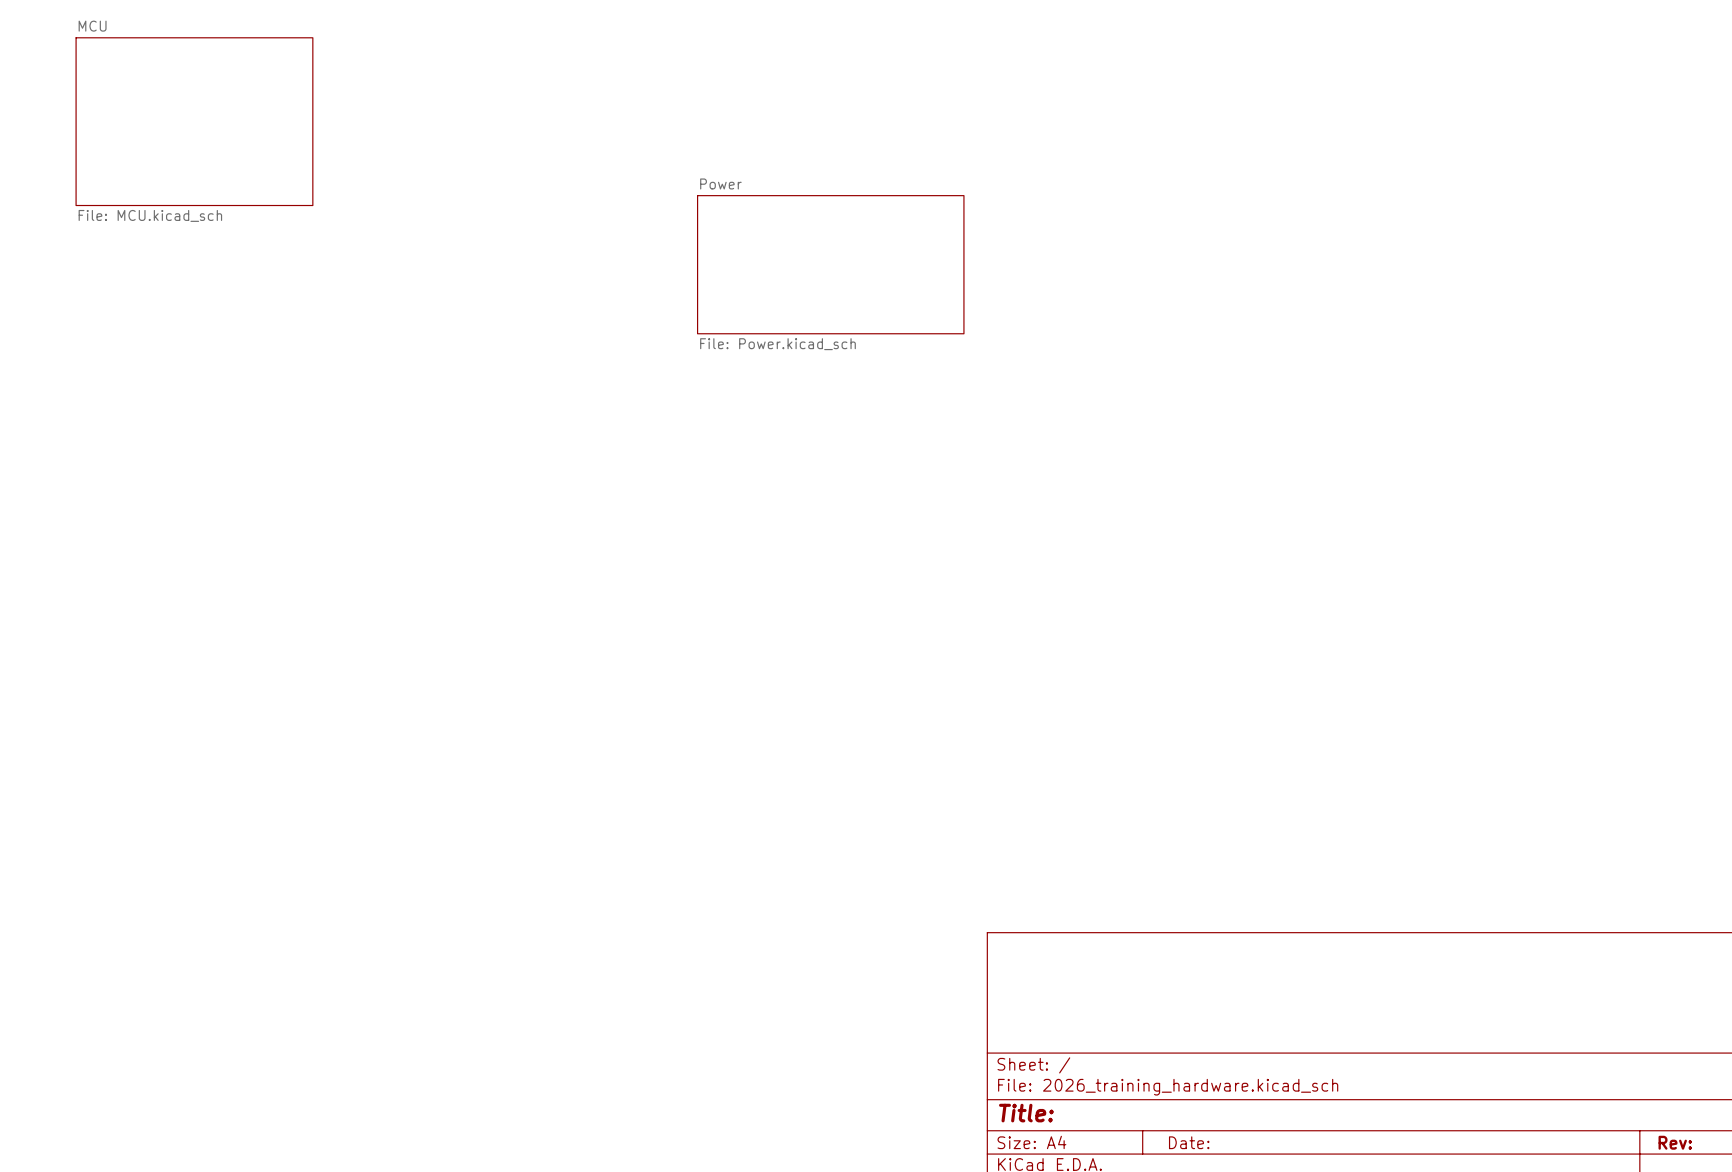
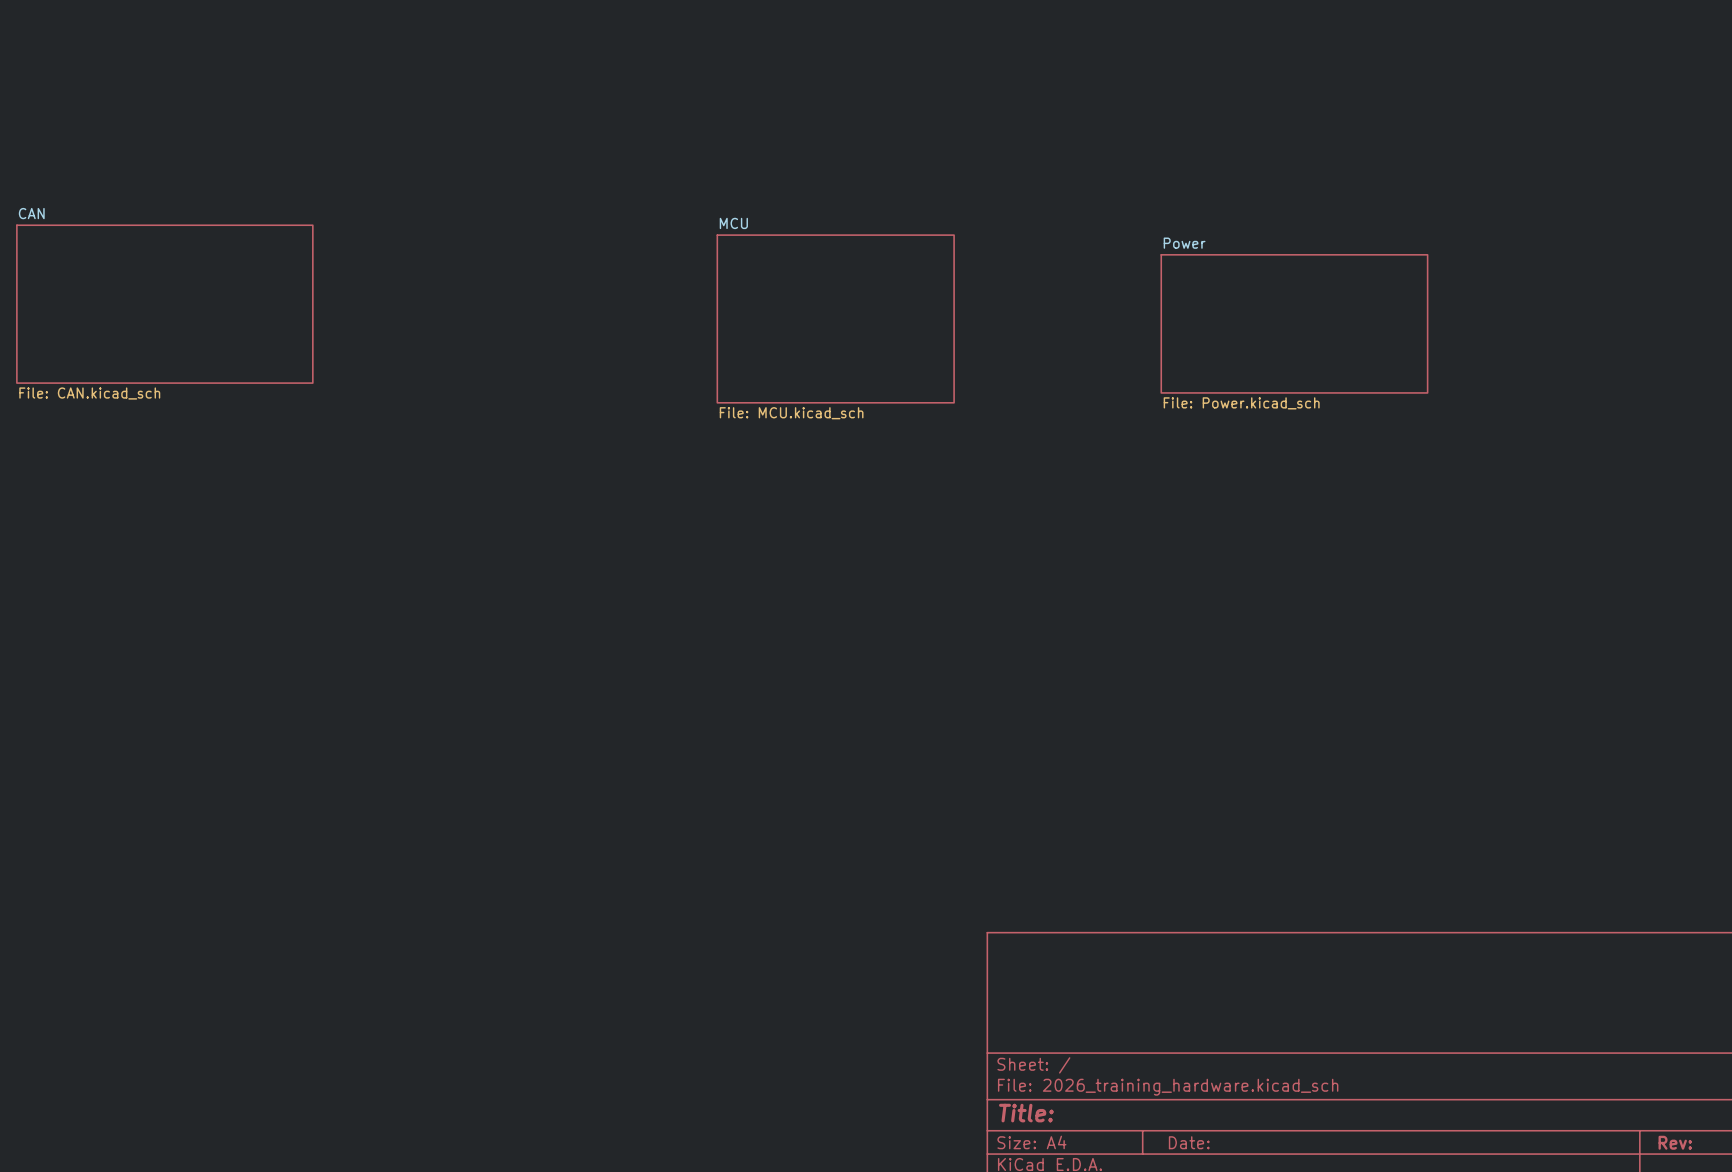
sheet MCU: File: MCU.kicad_sch (194, 121) -> none
sheet Power: File: Power.kicad_sch (830, 264) -> none
sheet CAN: none -> File: CAN.kicad_sch (164, 304)
sheet MCU: none -> File: MCU.kicad_sch (835, 318)
sheet Power: none -> File: Power.kicad_sch (1294, 323)

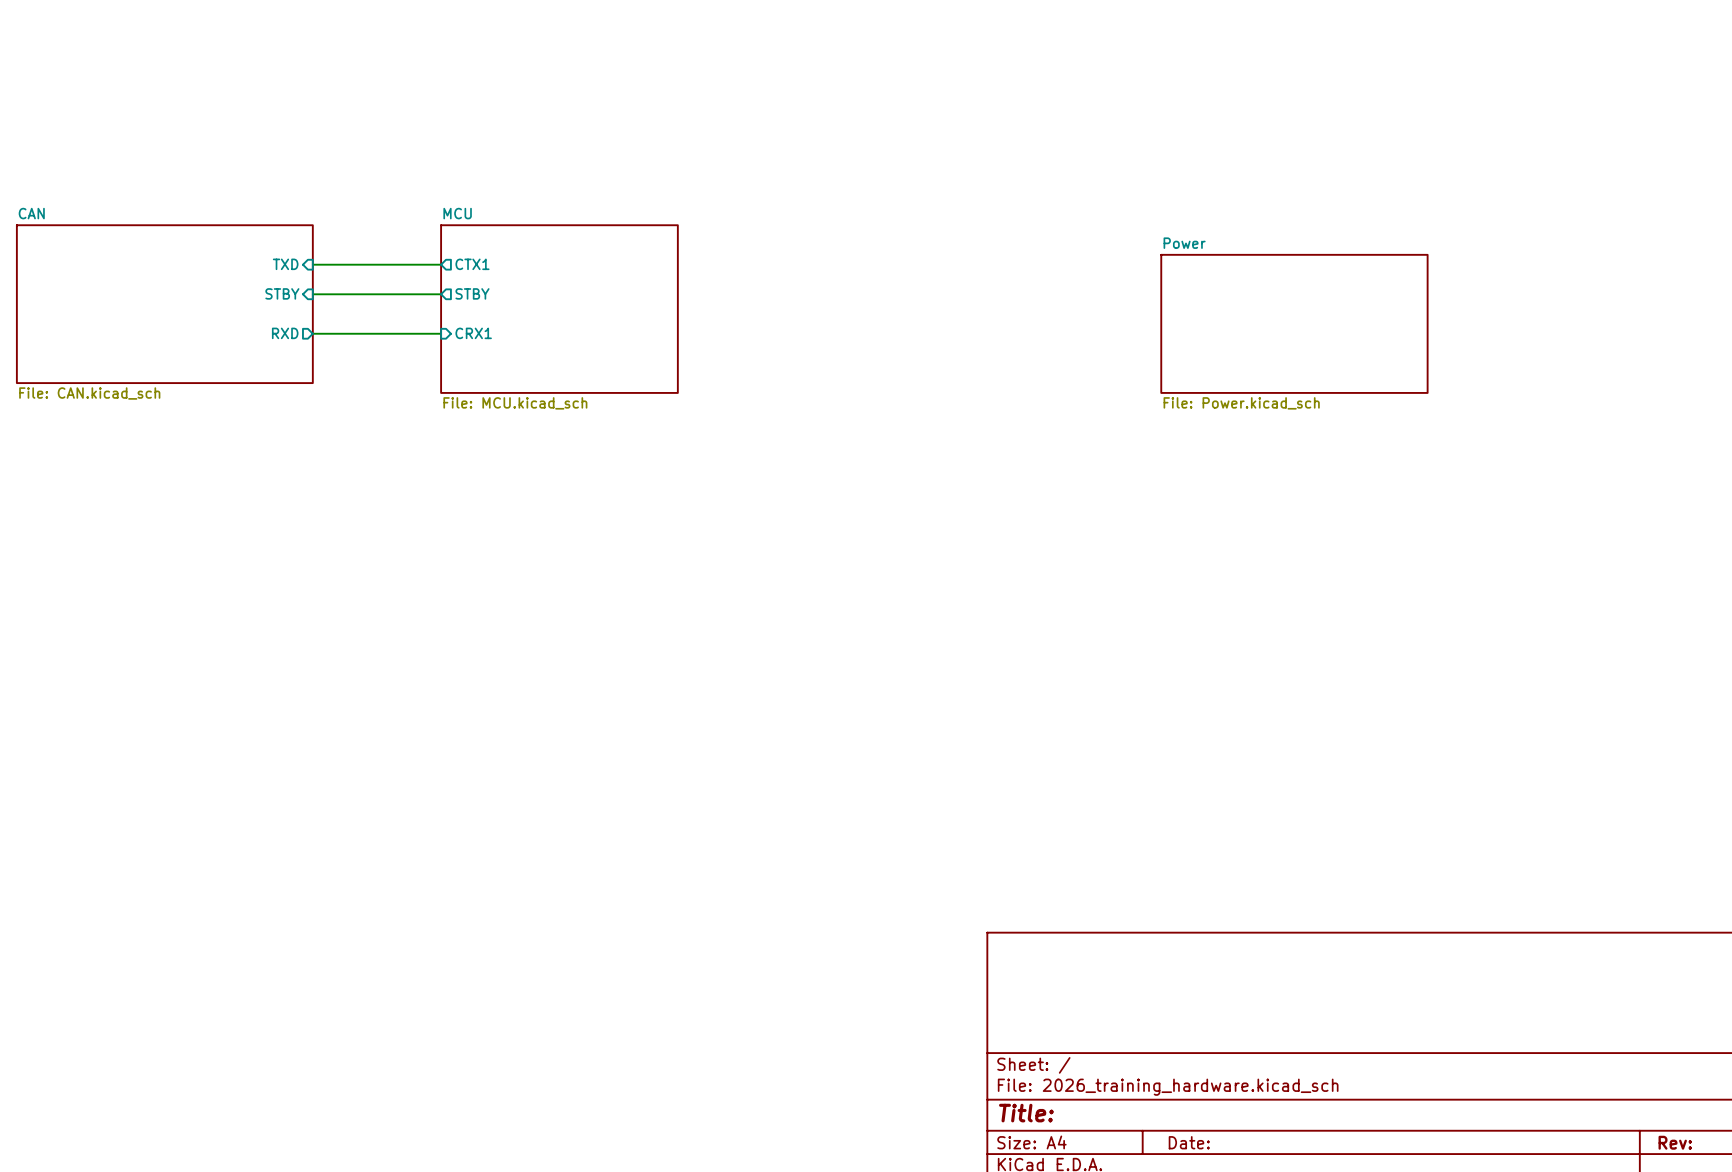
sheet pin: none -> TXD (285, 264)
wire: none -> (312, 264) (441, 264)
sheet pin: none -> CTX1 (472, 264)
sheet pin: none -> STBY (282, 293)
sheet pin: none -> STBY (472, 293)
wire: none -> (312, 294) (441, 294)
sheet MCU: none -> File: MCU.kicad_sch (559, 309)
sheet MCU: File: MCU.kicad_sch (835, 318) -> none
sheet pin: none -> RXD (285, 333)
wire: none -> (312, 333) (441, 333)
sheet pin: none -> CRX1 (473, 333)

